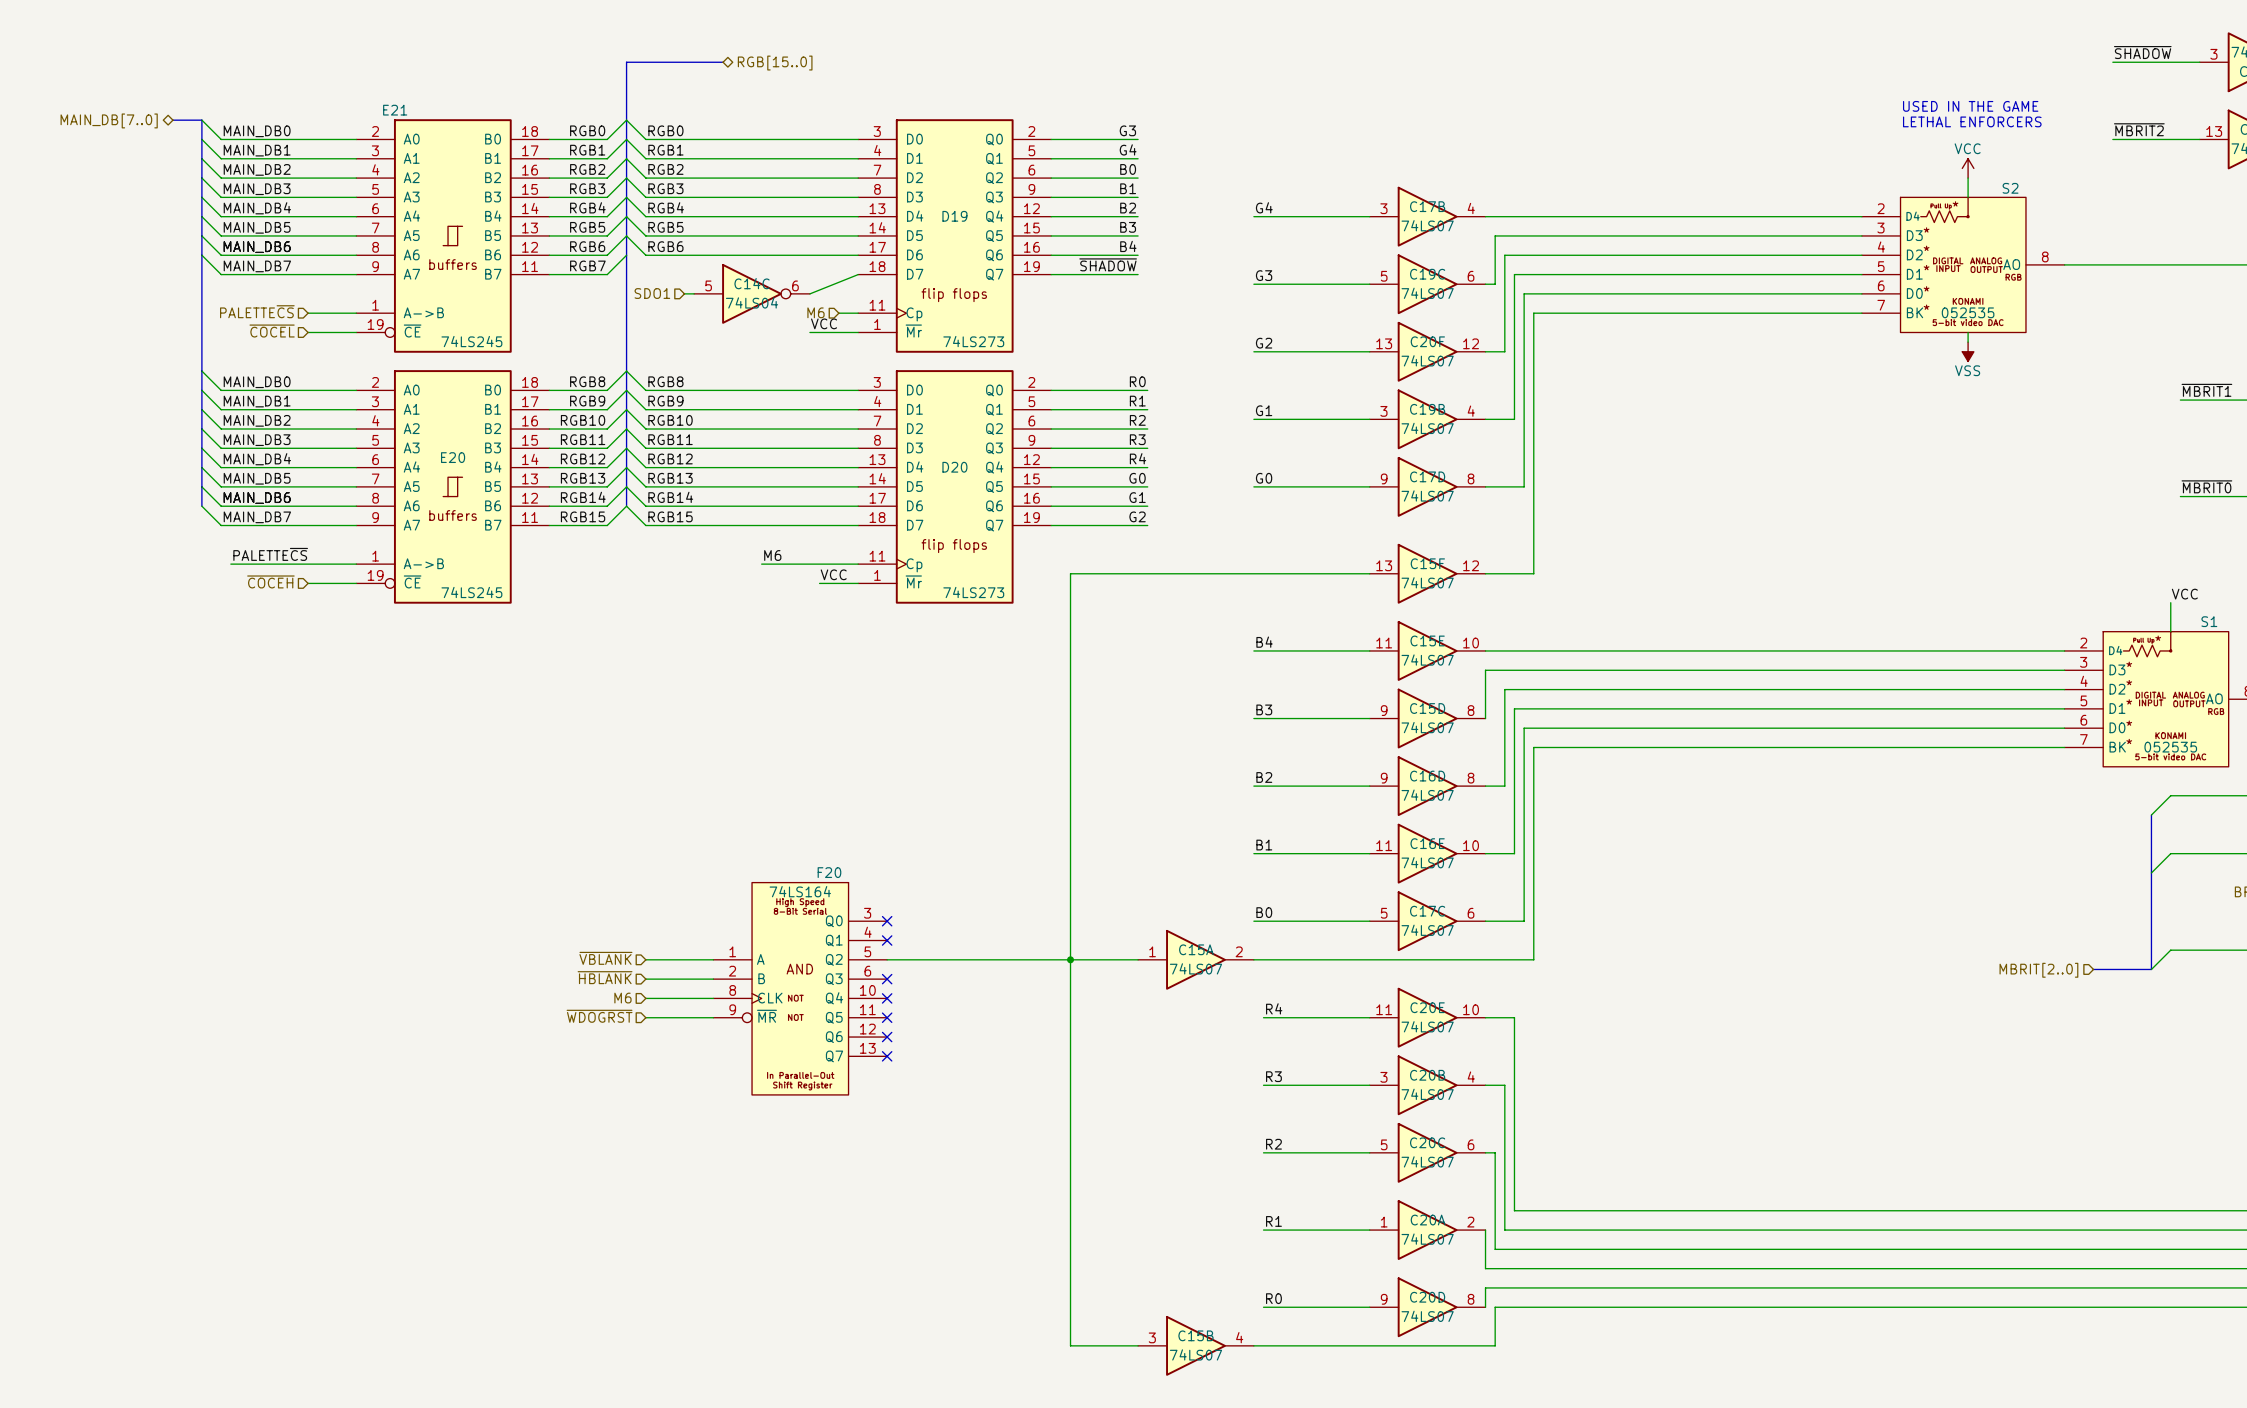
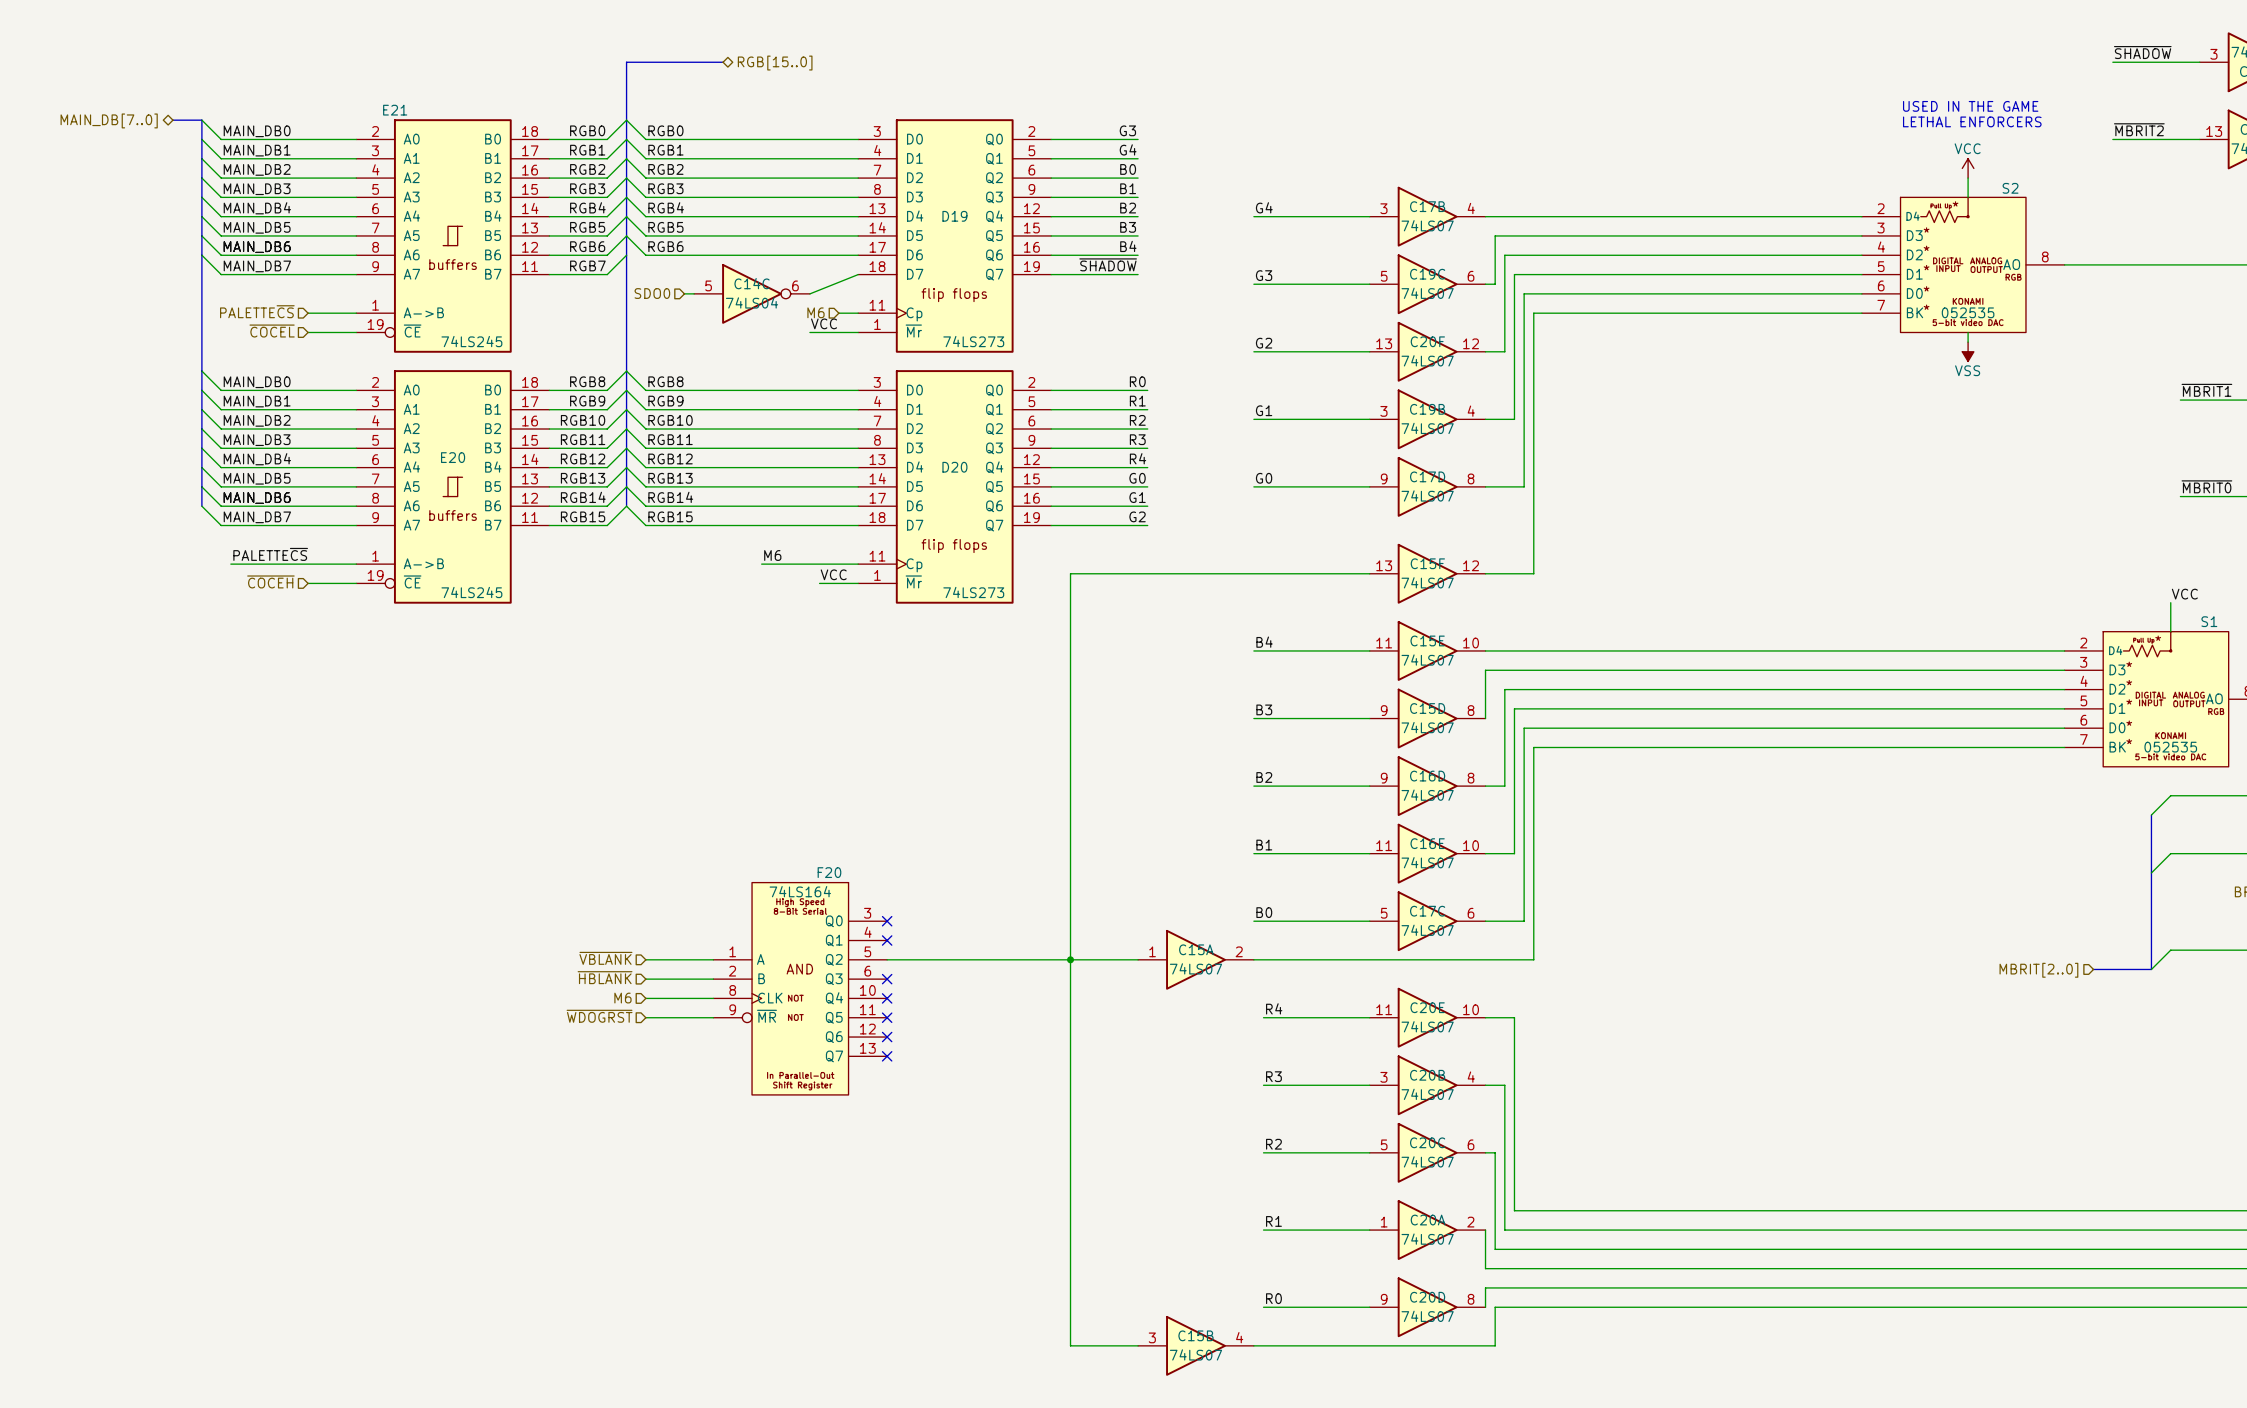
hierarchical label: SDO1 (652, 293) -> SDO0 (652, 293)

